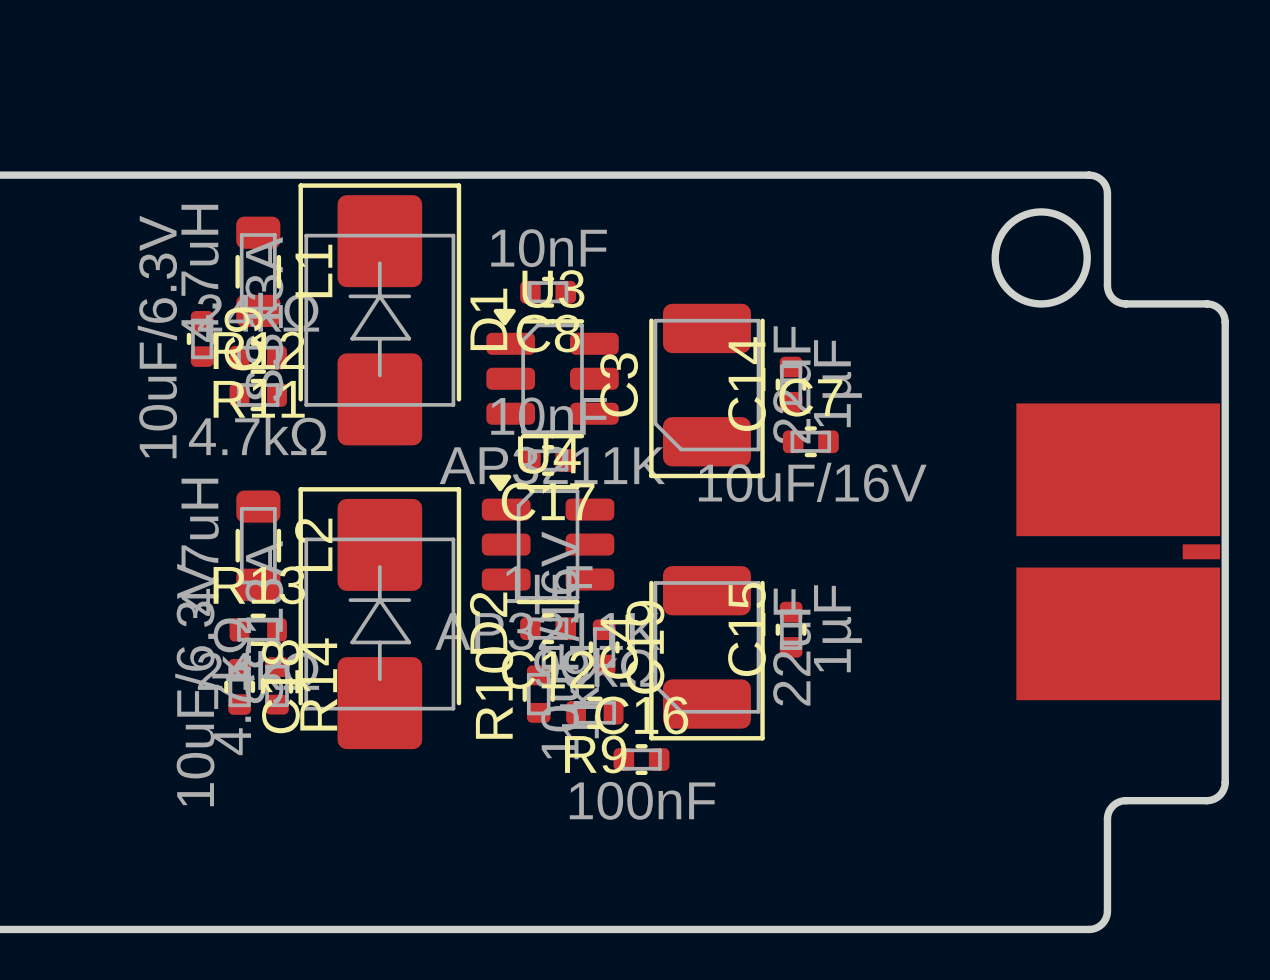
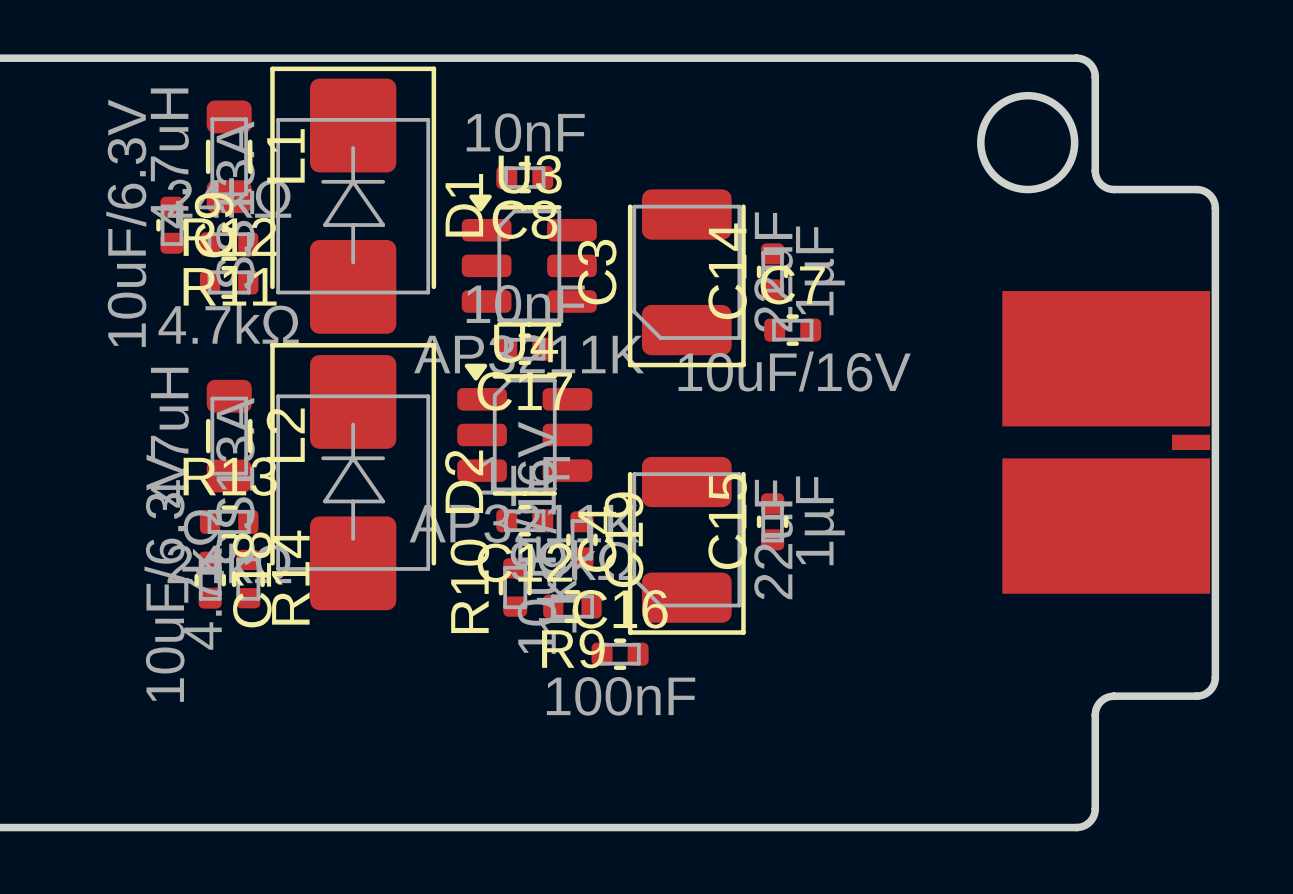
D2 position: (379, 618) -> (353, 476)

